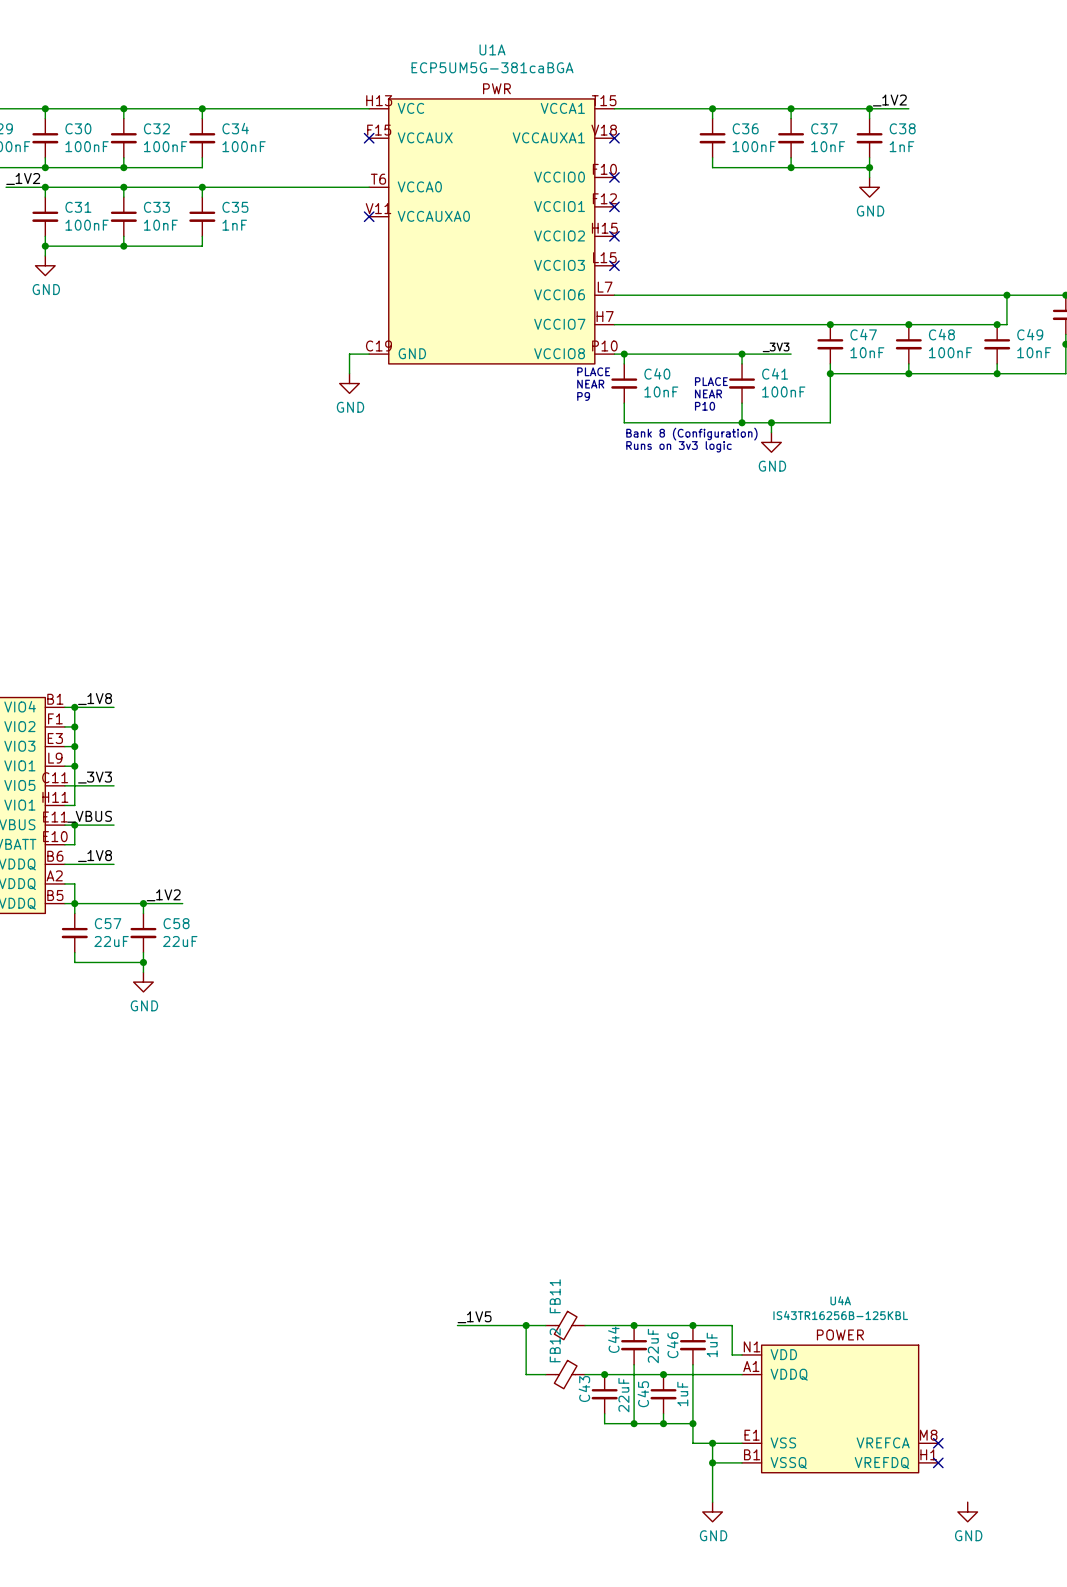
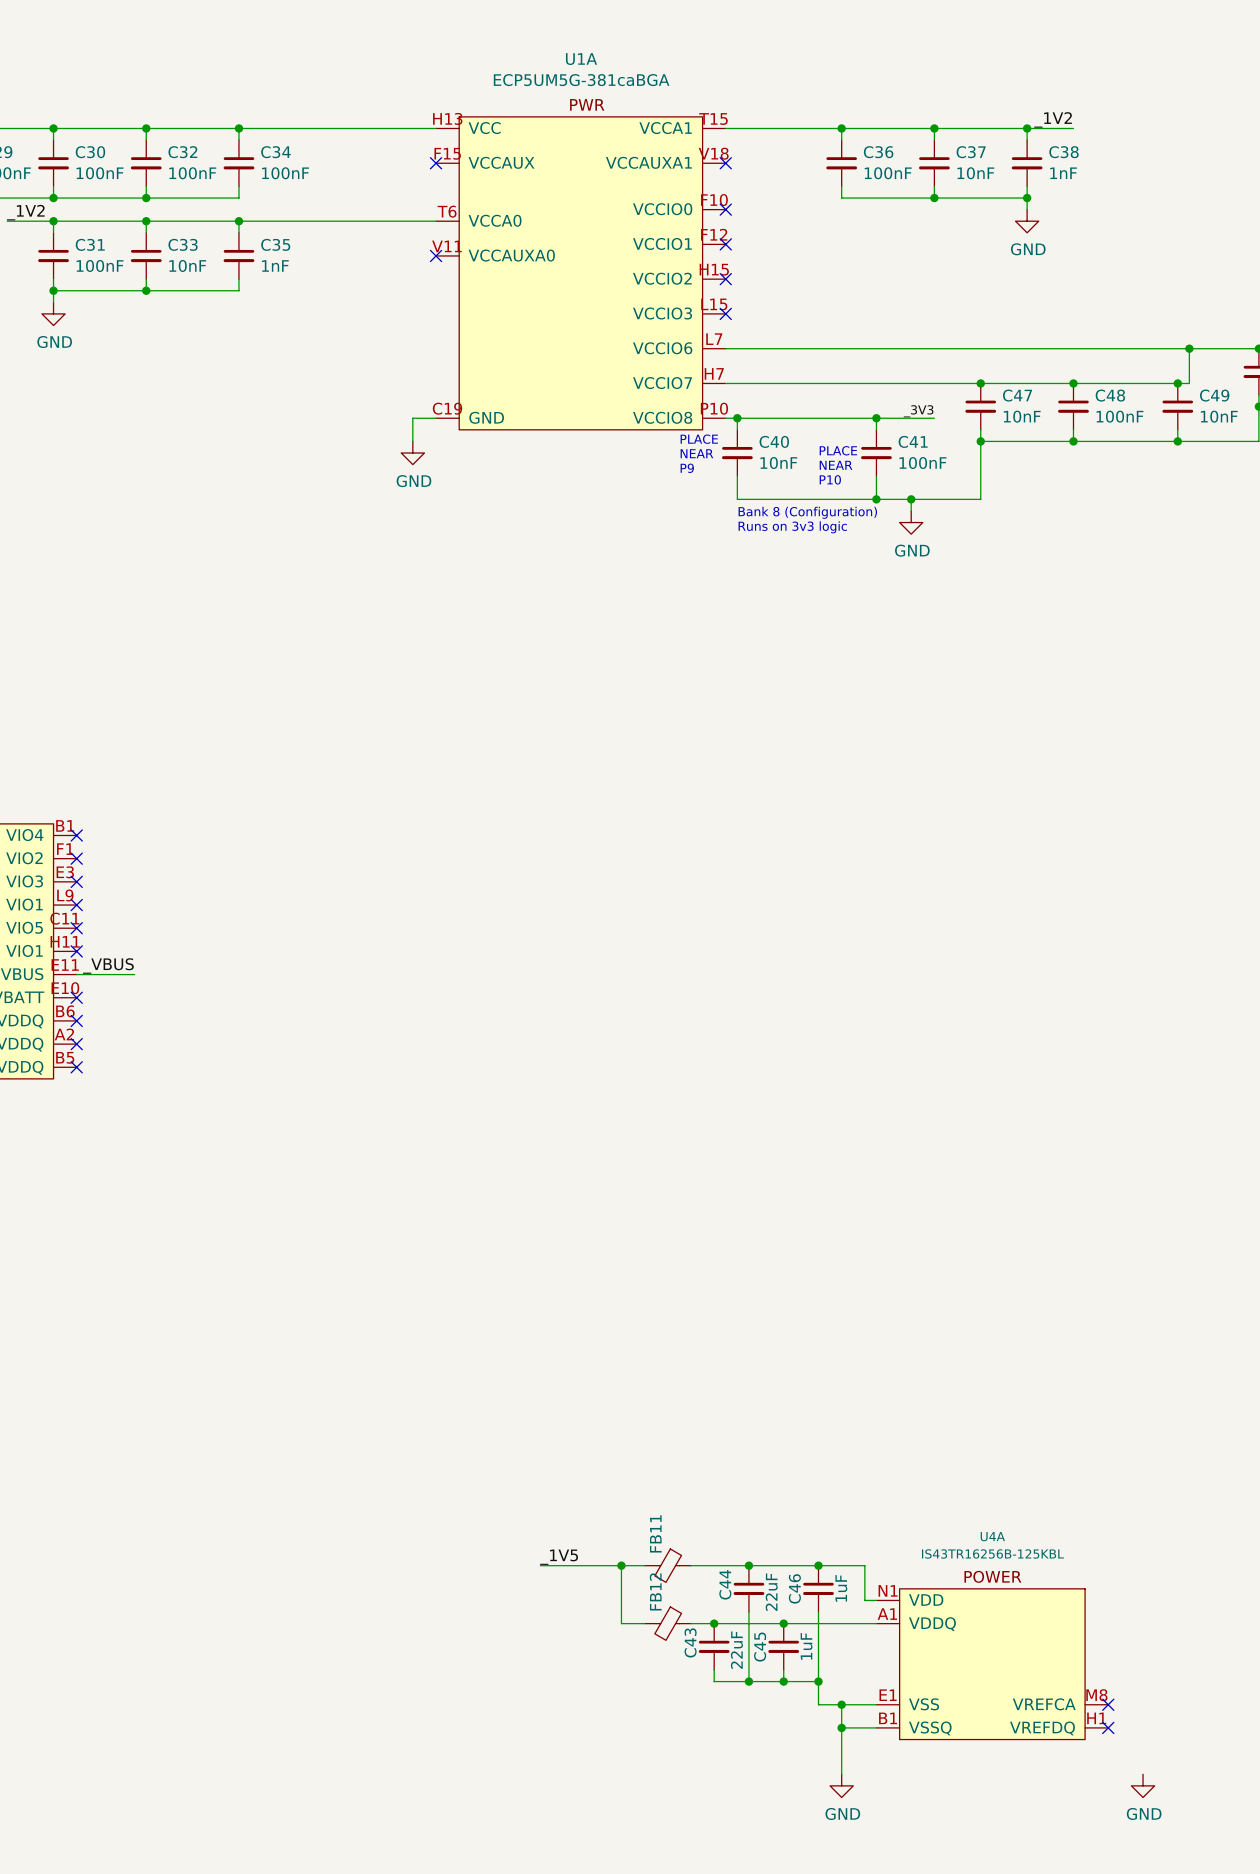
label: _1V8 (95, 699) -> none
wire: (64, 707) (114, 707) -> none
no-connect mark: none -> (76, 835)
wire: (74, 707) (74, 805) (64, 805) -> none
junction: (74, 707) -> none
wire: (64, 726) (74, 726) -> none
no-connect mark: none -> (76, 858)
junction: (74, 726) -> none
wire: (64, 746) (74, 746) -> none
no-connect mark: none -> (76, 881)
junction: (74, 746) -> none
wire: (64, 766) (74, 766) -> none
no-connect mark: none -> (76, 905)
junction: (74, 766) -> none
label: _3V3 (95, 777) -> none
wire: (64, 785) (114, 785) -> none
no-connect mark: none -> (76, 928)
no-connect mark: none -> (76, 951)
wire: (74, 825) (74, 844) (64, 844) -> none
junction: (74, 825) -> none
no-connect mark: none -> (76, 997)
label: _1V8 (95, 856) -> none
wire: (64, 864) (114, 864) -> none
no-connect mark: none -> (76, 1020)
wire: (64, 883) (74, 883) (74, 913) -> none
no-connect mark: none -> (76, 1044)
label: _1V2 (163, 895) -> none
wire: (64, 903) (182, 903) -> none
no-connect mark: none -> (76, 1067)
junction: (74, 903) -> none
wire: (143, 903) (143, 913) -> none
junction: (143, 903) -> none
C57: 22uF (74, 933) -> none
C58: 22uF (143, 933) -> none
wire: (74, 952) (74, 962) (143, 962) -> none
wire: (143, 952) (143, 972) -> none
junction: (143, 962) -> none
power symbol: GND (143, 982) -> none

